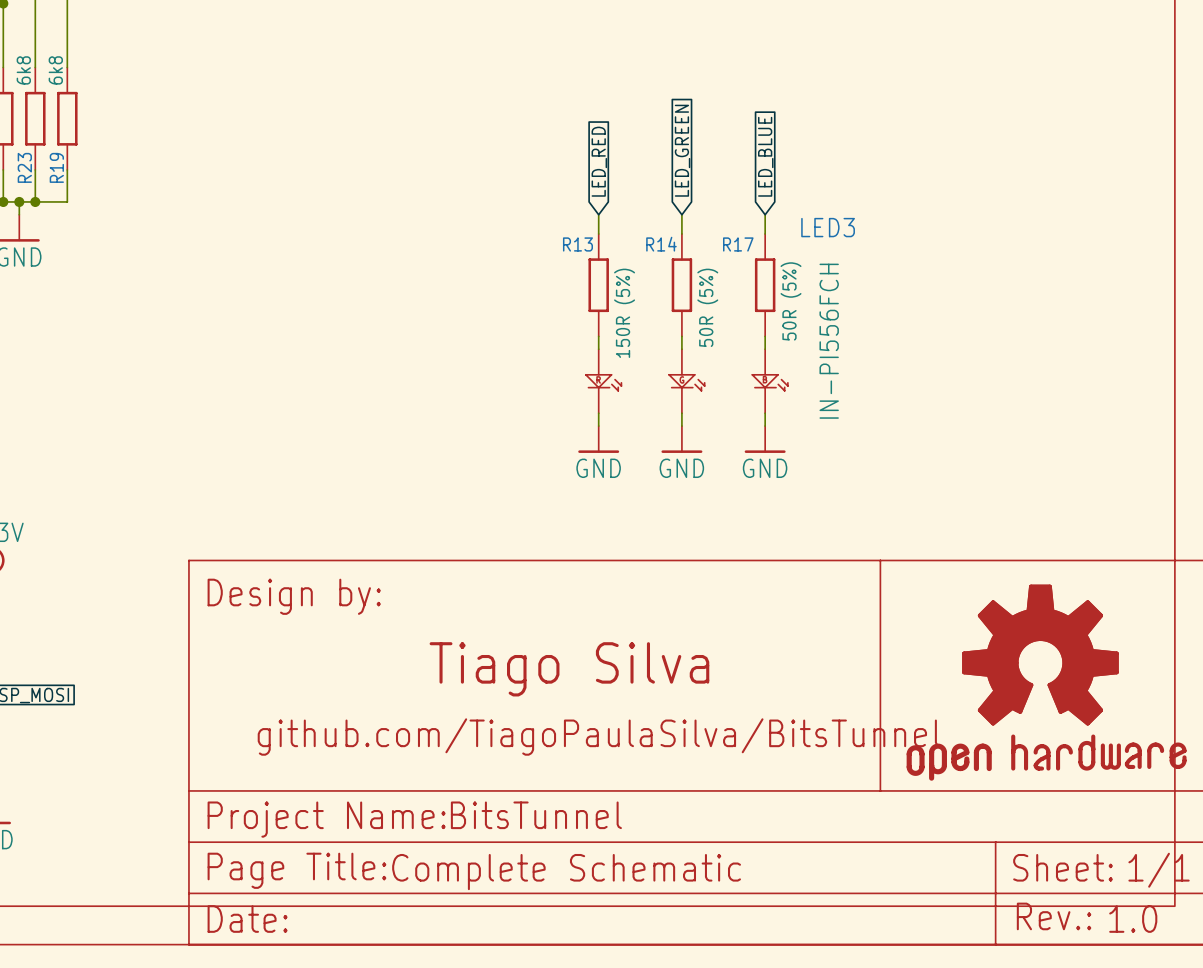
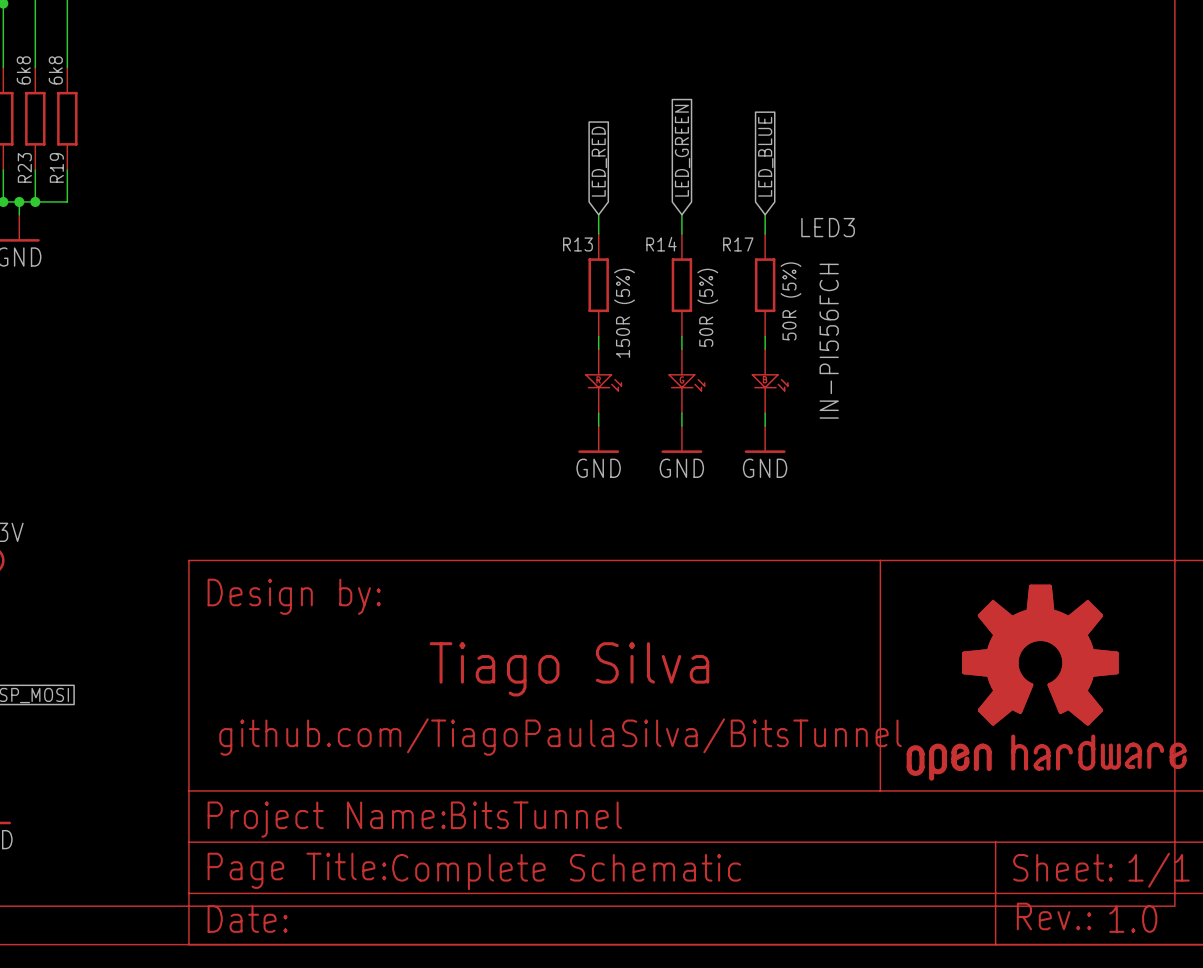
text position: github.com/TiagoPaulaSilva/BitsTunnel (598, 737) -> github.com/TiagoPaulaSilva/BitsTunnel (560, 737)

